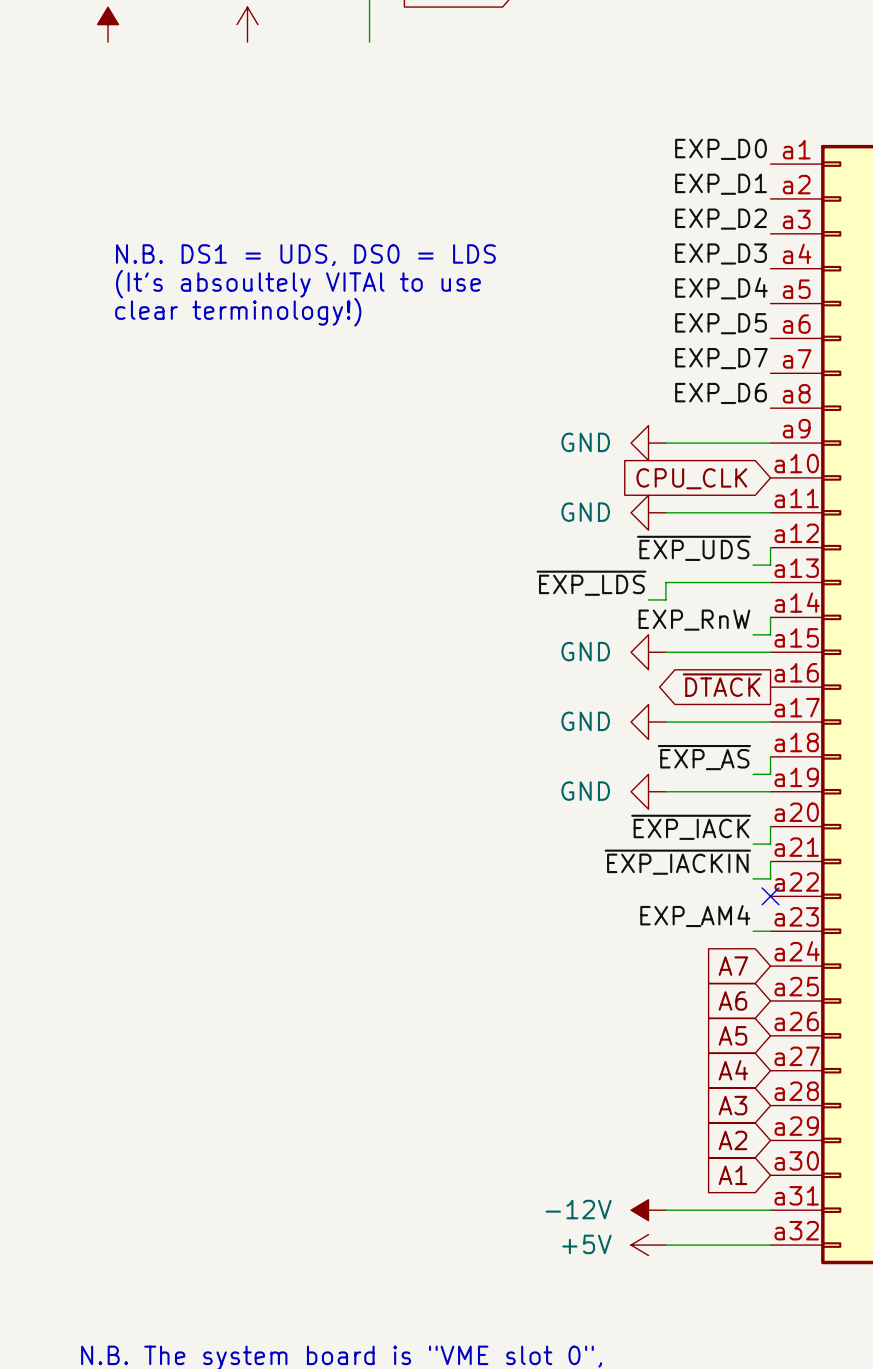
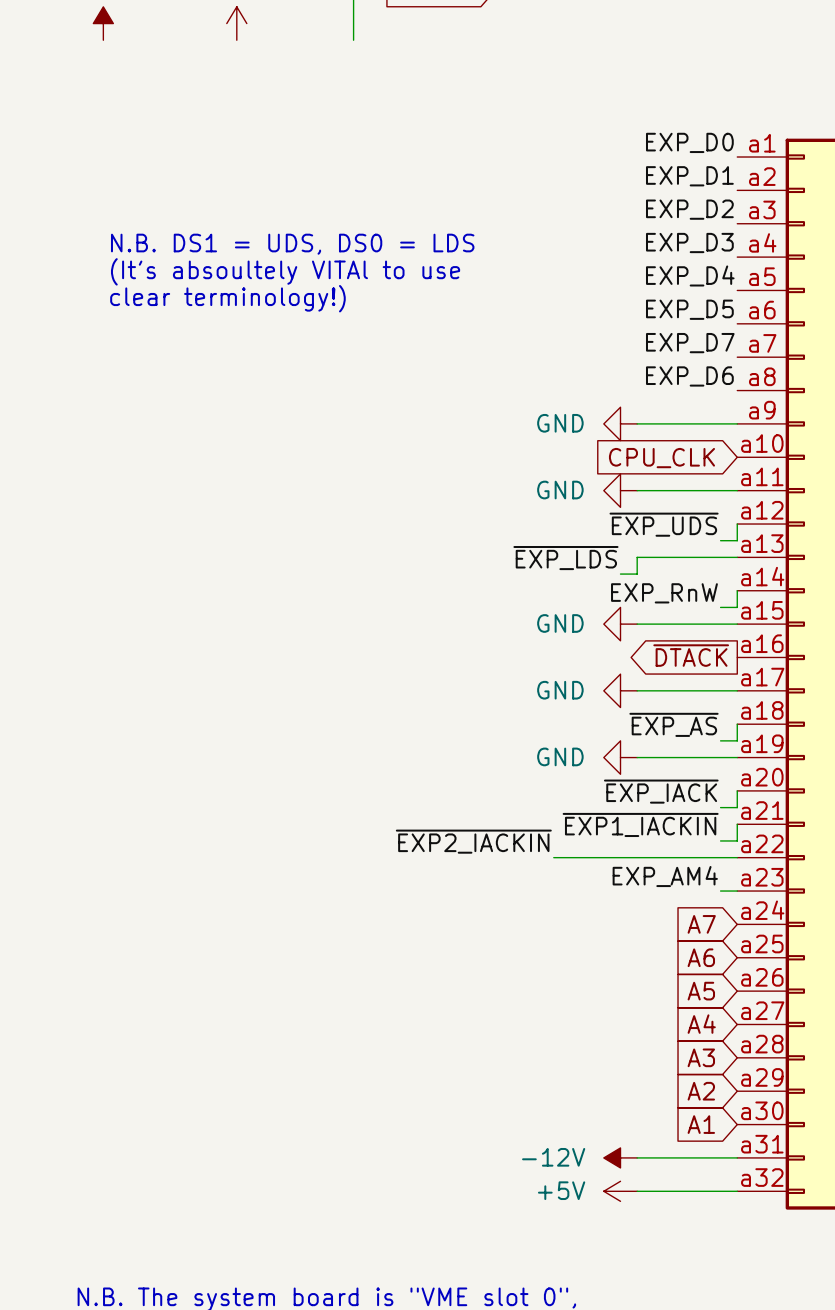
label: ~{EXP_IACKIN} (677, 862) -> ~{EXP1_IACKIN} (640, 824)
label: none -> ~{EXP2_IACKIN} (473, 841)
wire: none -> (553, 857) (737, 857)
no-connect mark: (770, 896) -> none

